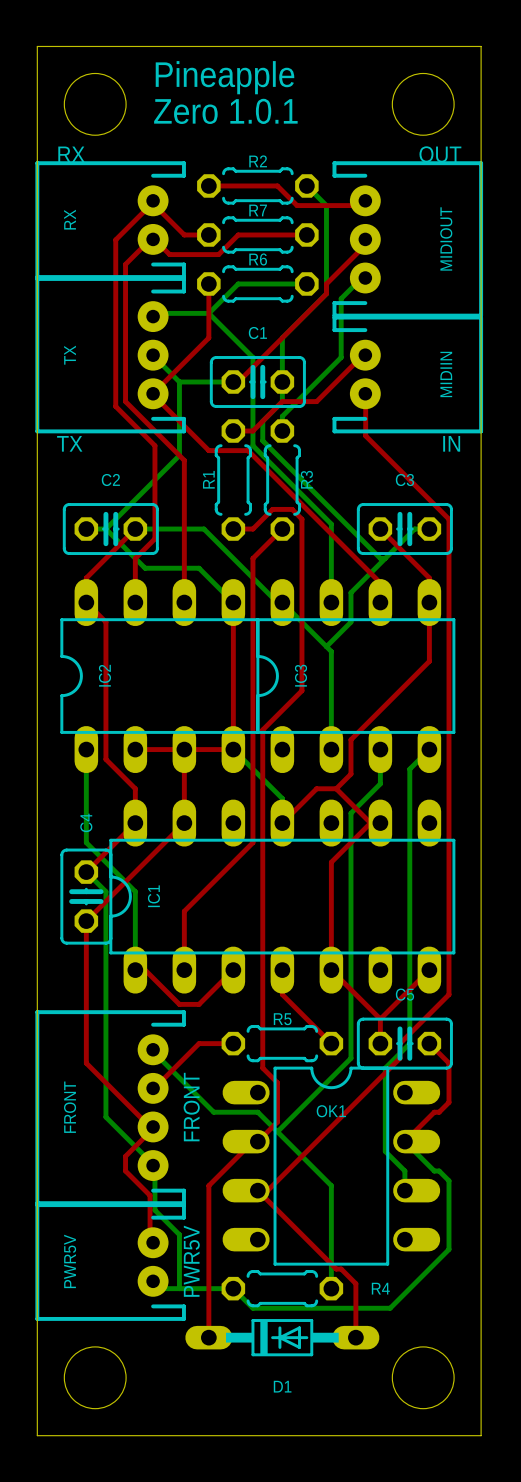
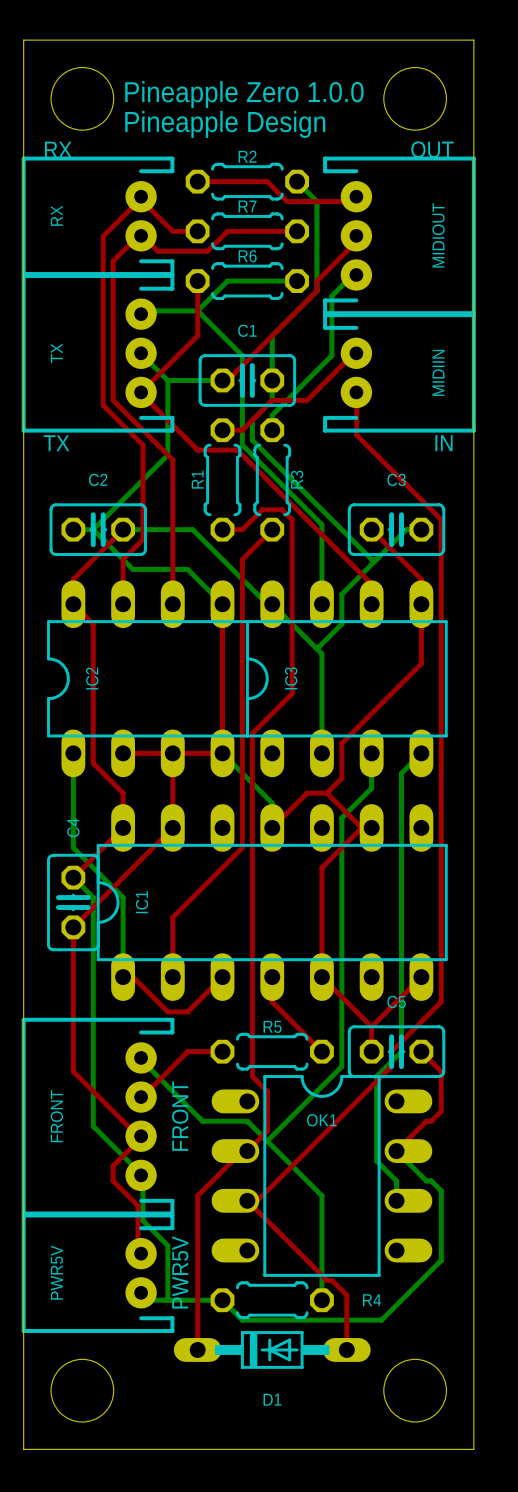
text: Pineapple (225, 77) -> Pineapple Zero 1.0.0 (244, 94)
text: Zero 1.0.1 (225, 111) -> none
text: none -> Pineapple Design (225, 124)

